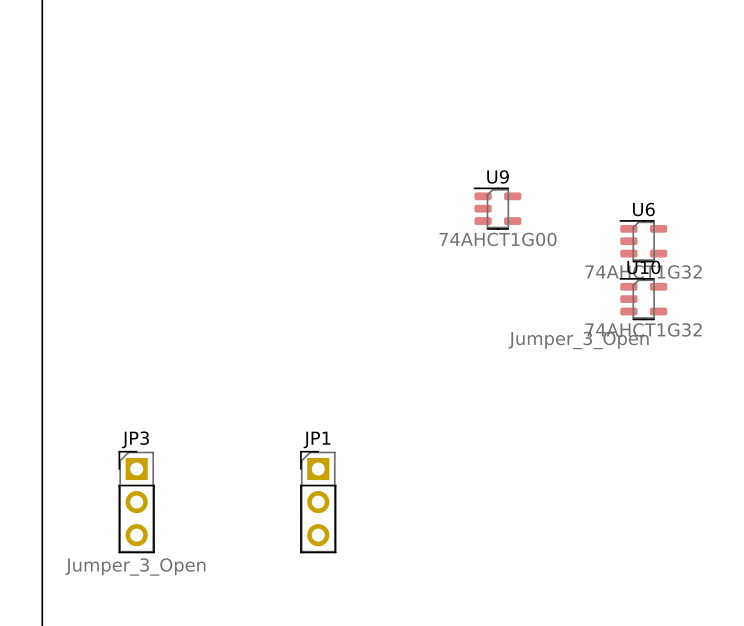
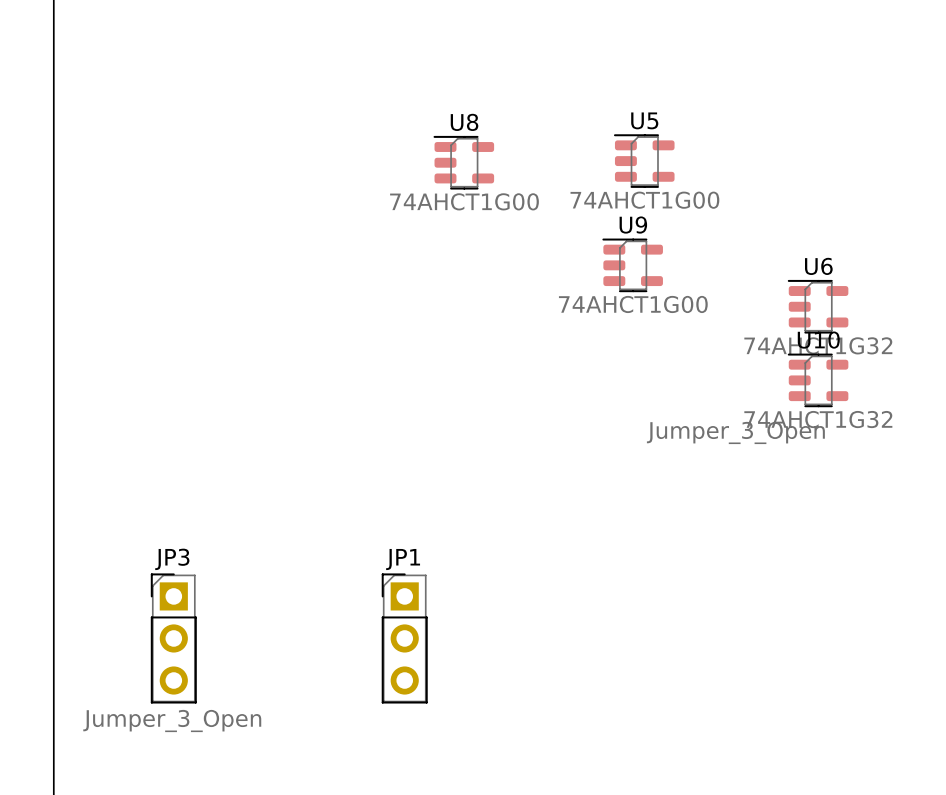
U5: none -> 74AHCT1G00 (644, 161)
U8: none -> 74AHCT1G00 (463, 162)

